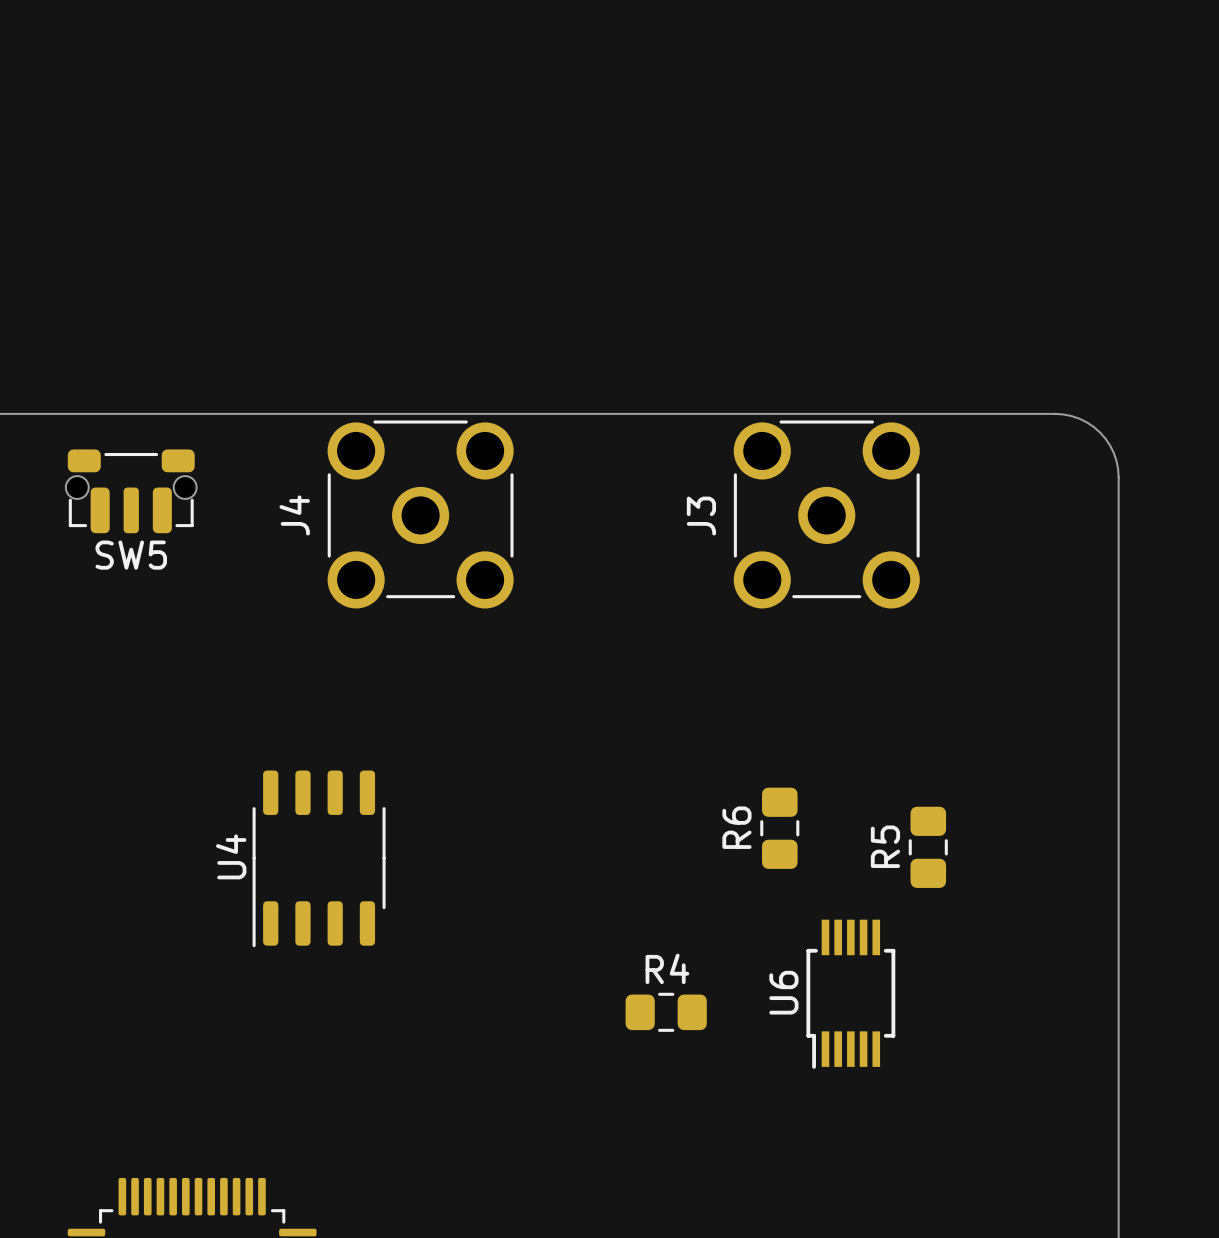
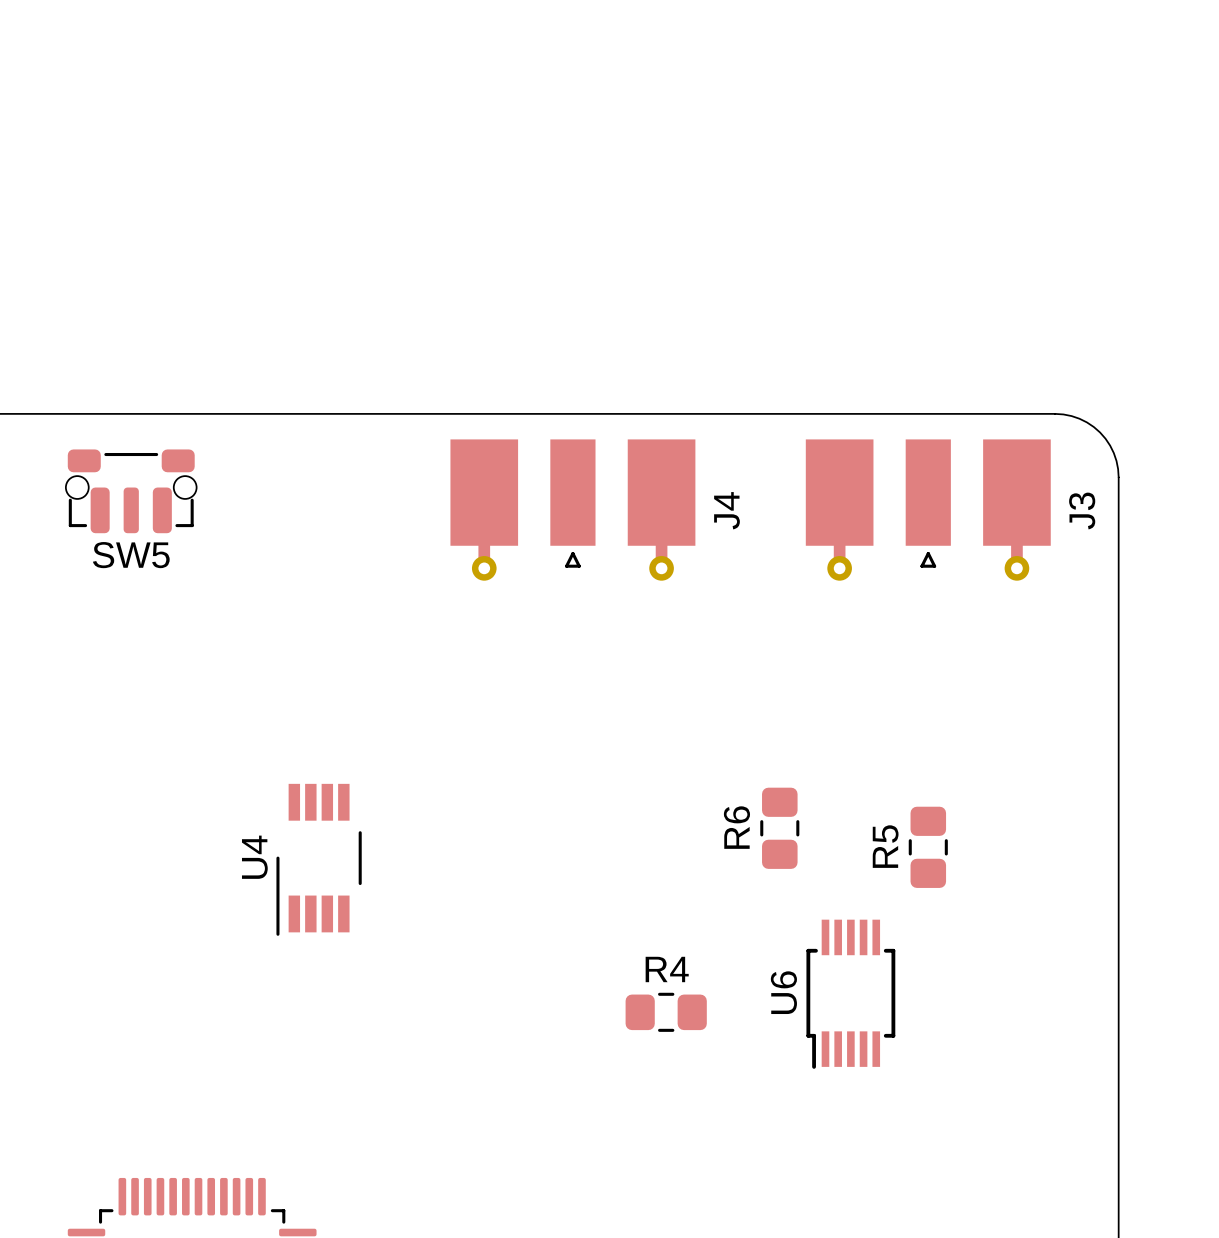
J4 footprint: [327, 420, 514, 609] -> [450, 439, 696, 581]
J3 footprint: [733, 420, 920, 609] -> [805, 439, 1051, 581]
J4 name position: J4 (294, 515) -> J4 (726, 510)
J3 name position: J3 (701, 516) -> J3 (1082, 511)
U4 footprint: [252, 770, 386, 948] -> [276, 783, 362, 936]

